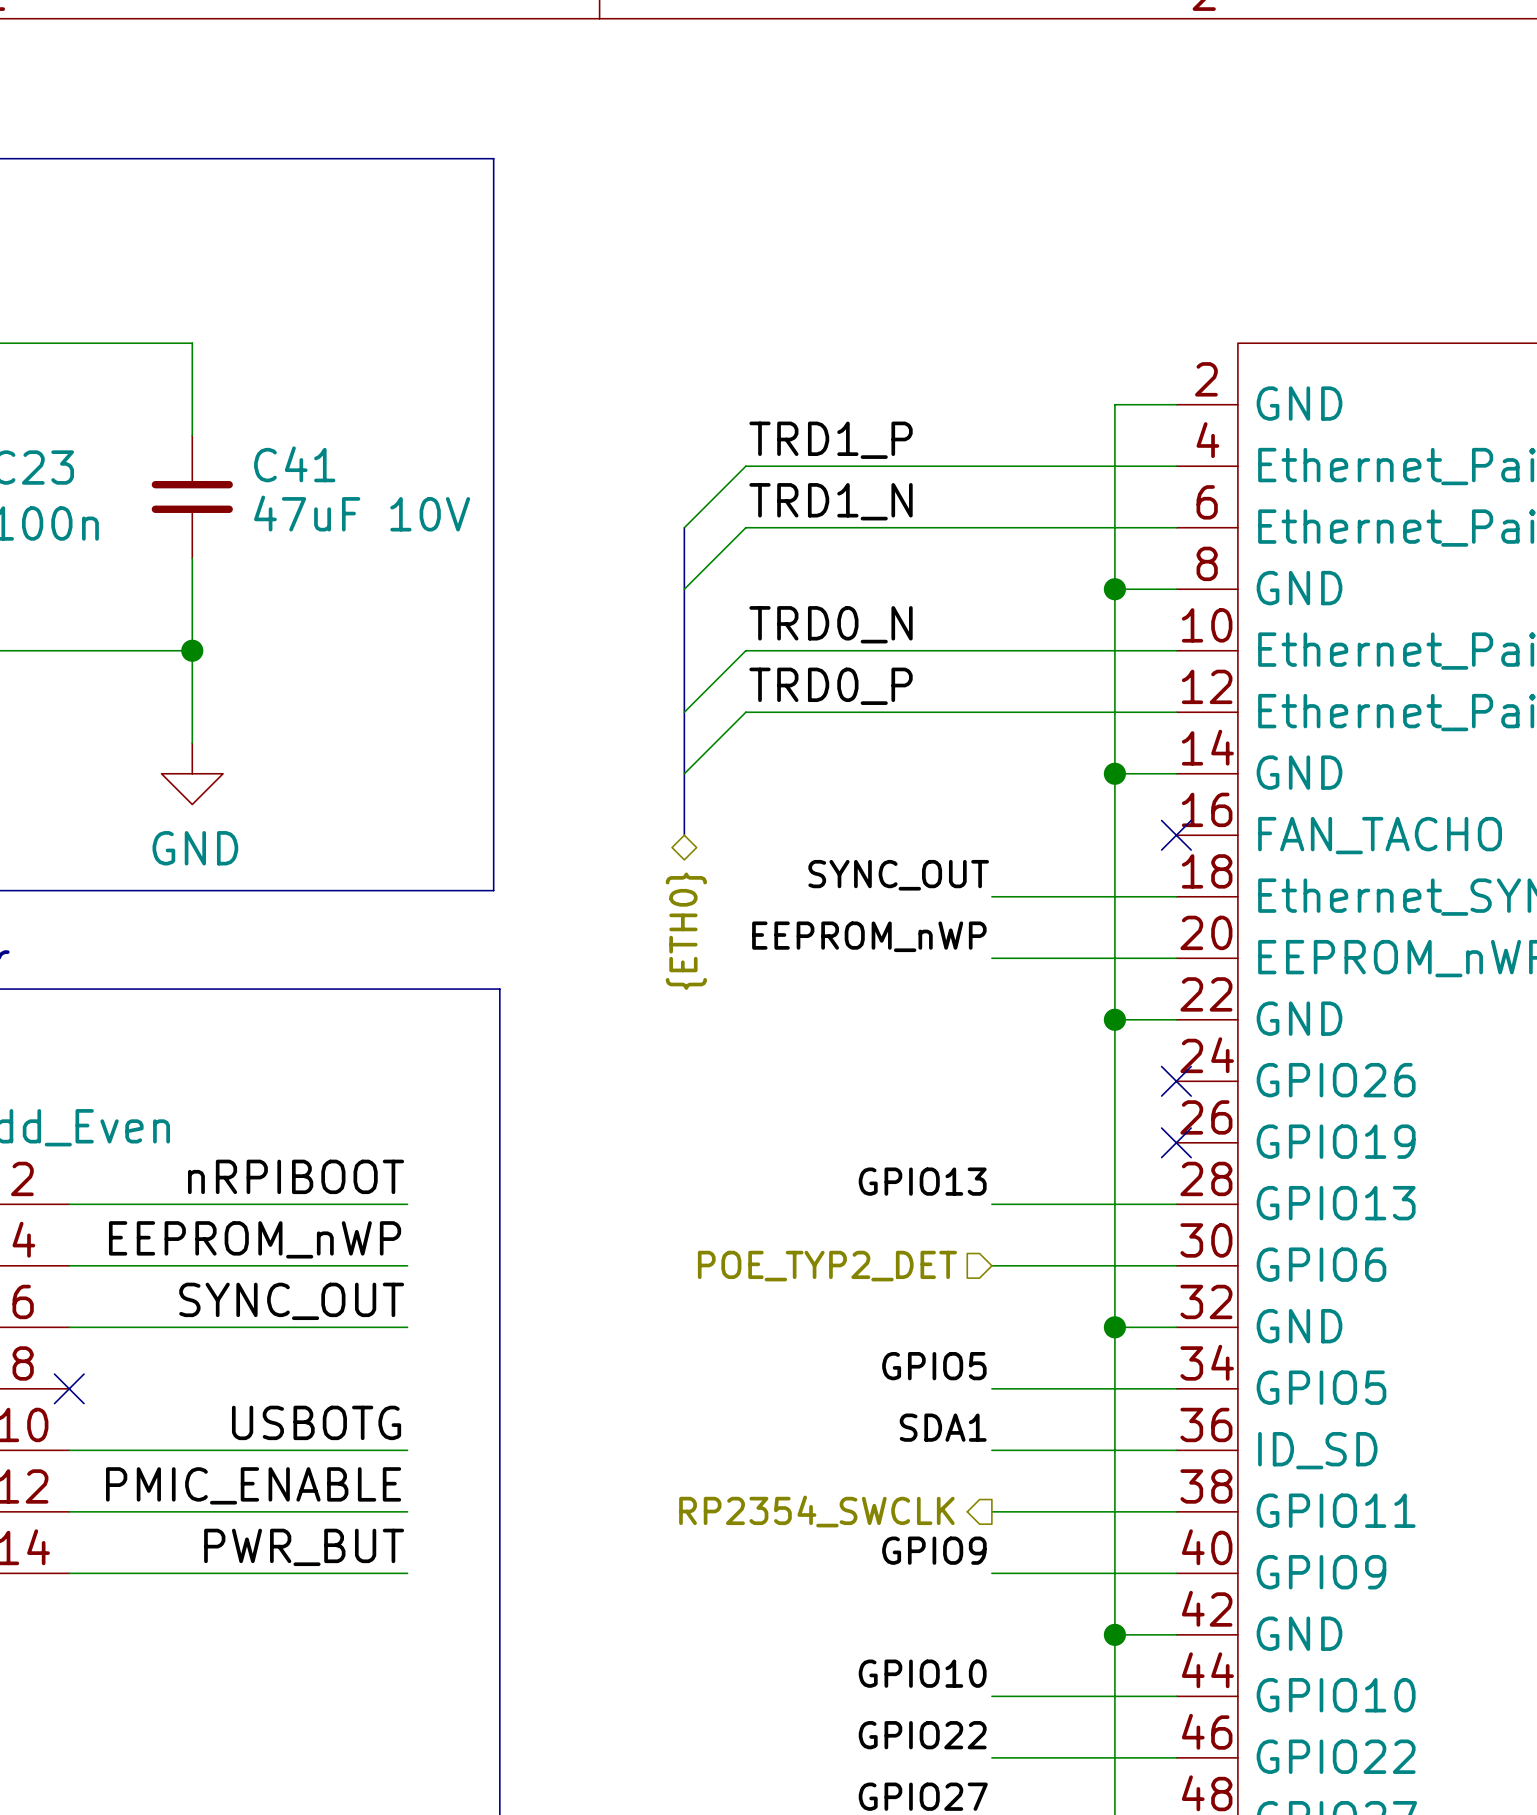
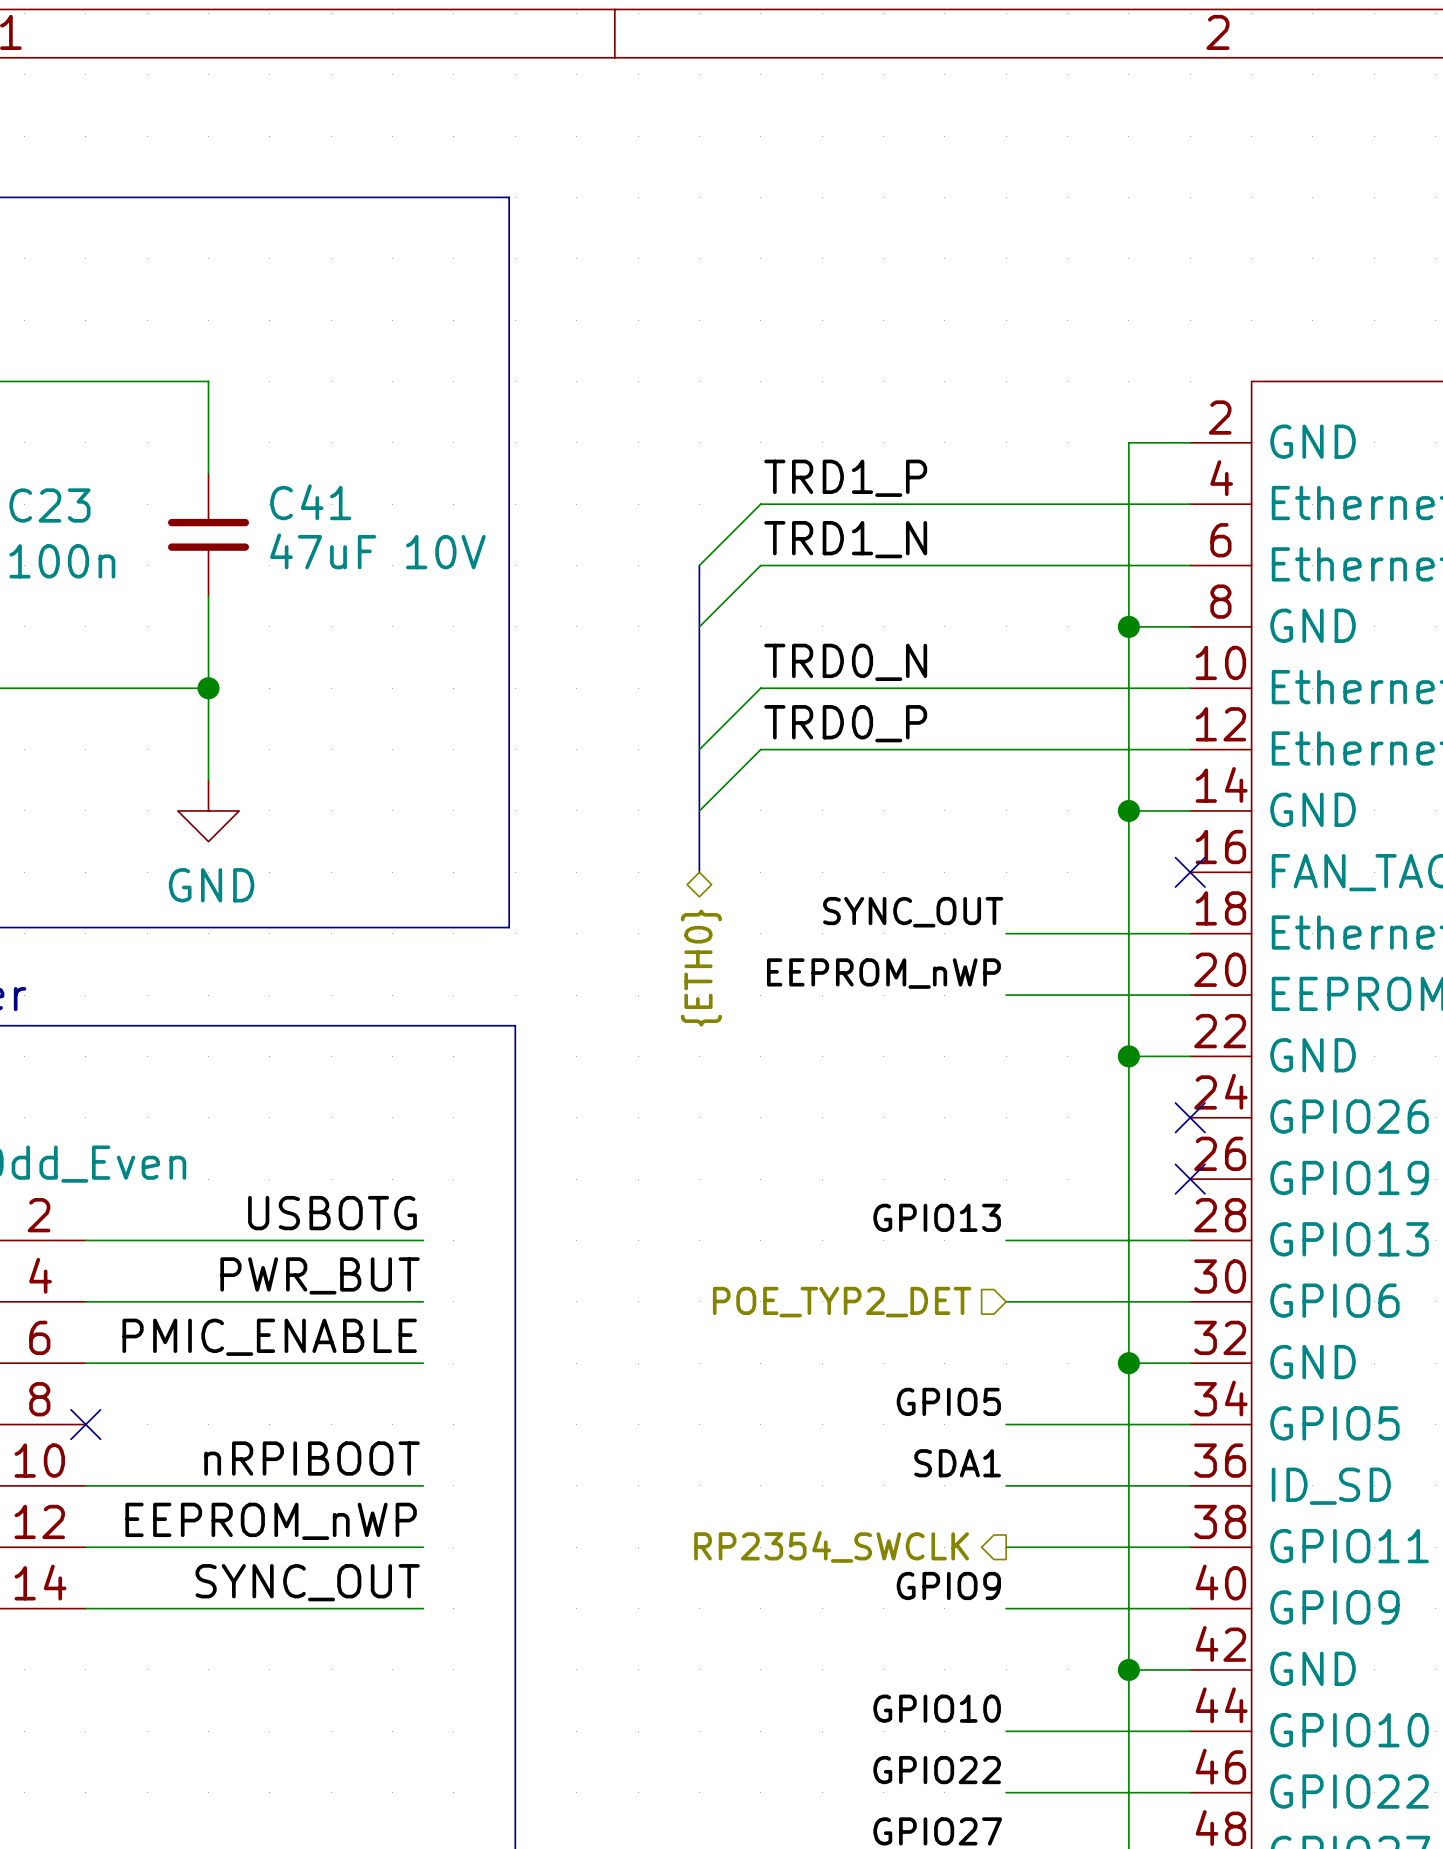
label: nRPIBOOT (296, 1176) -> USBOTG (332, 1213)
label: EEPROM_nWP (255, 1239) -> PWR_BUT (320, 1275)
label: SYNC_OUT (291, 1301) -> PMIC_ENABLE (269, 1337)
label: USBOTG (316, 1422) -> nRPIBOOT (312, 1458)
label: PMIC_ENABLE (253, 1485) -> EEPROM_nWP (271, 1521)
label: PWR_BUT (304, 1547) -> SYNC_OUT (307, 1582)

